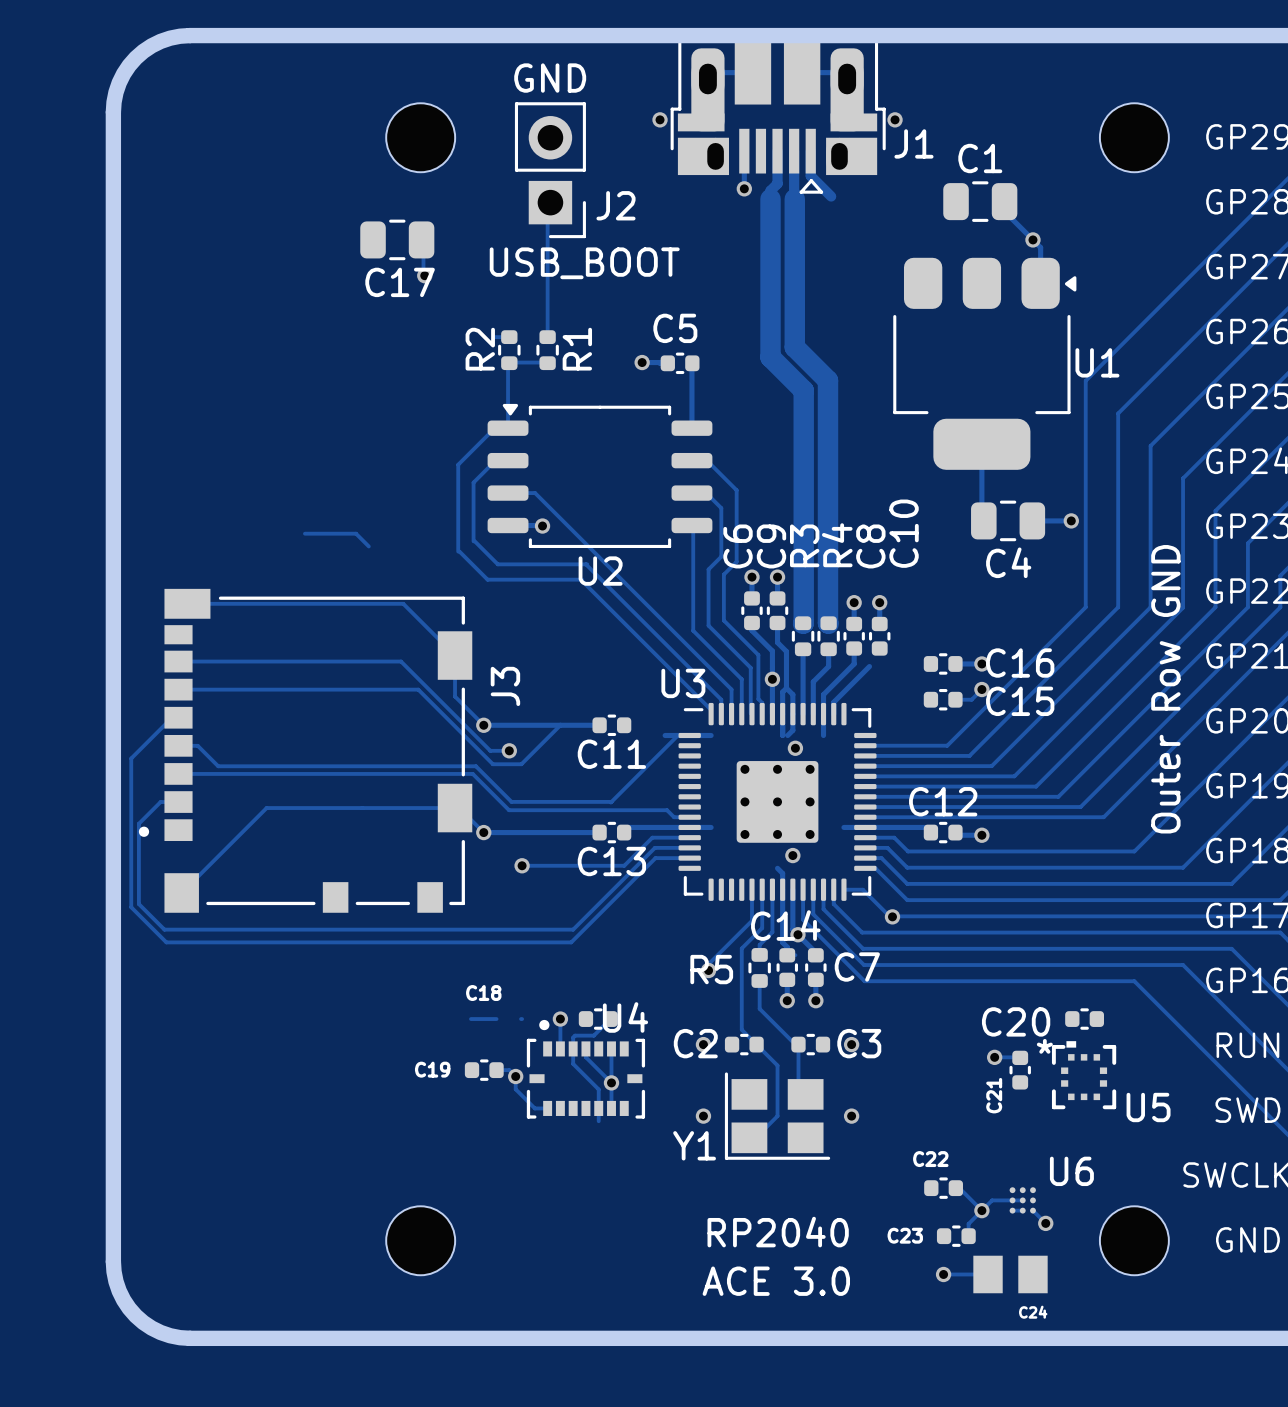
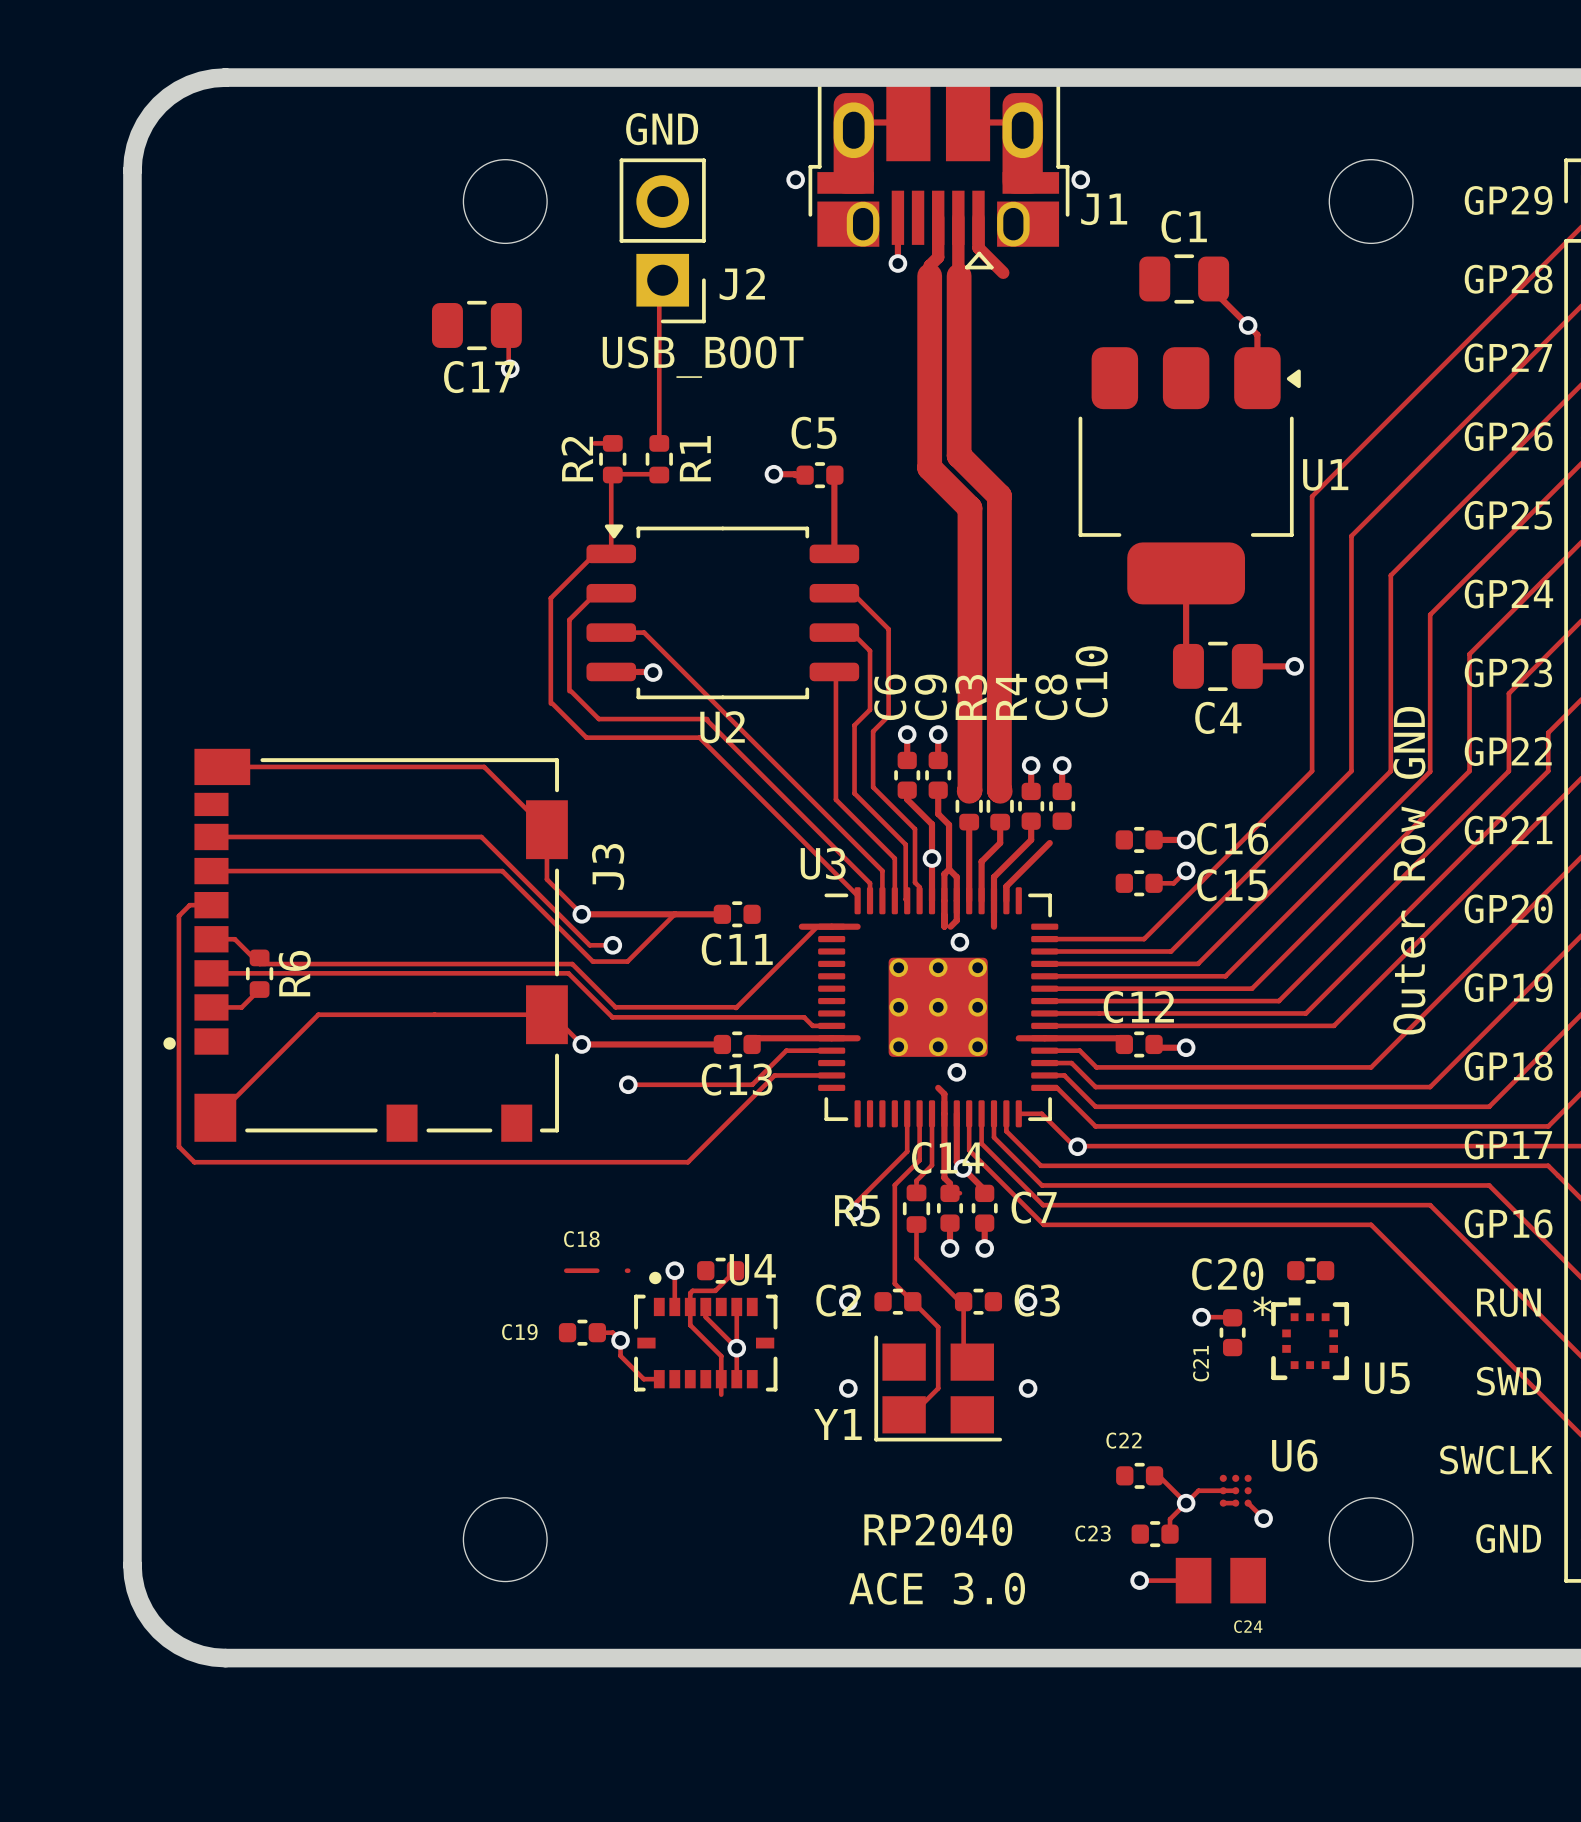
track: (304, 533) (356, 533) (368, 546) -> none
track: (171, 717) (131, 758) (131, 907) (166, 942) (571, 942) (655, 858) -> none
R6: none -> (259, 973)
track: none -> (259, 989) (241, 1007) (211, 1007)
track: (178, 802) (160, 802) (138, 823) (138, 904) (151, 916) -> (203, 905) (189, 905) (178, 916) (178, 1146)
track: (689, 847) (654, 847) (571, 929) -> (790, 1075) (774, 1075) (687, 1162)

